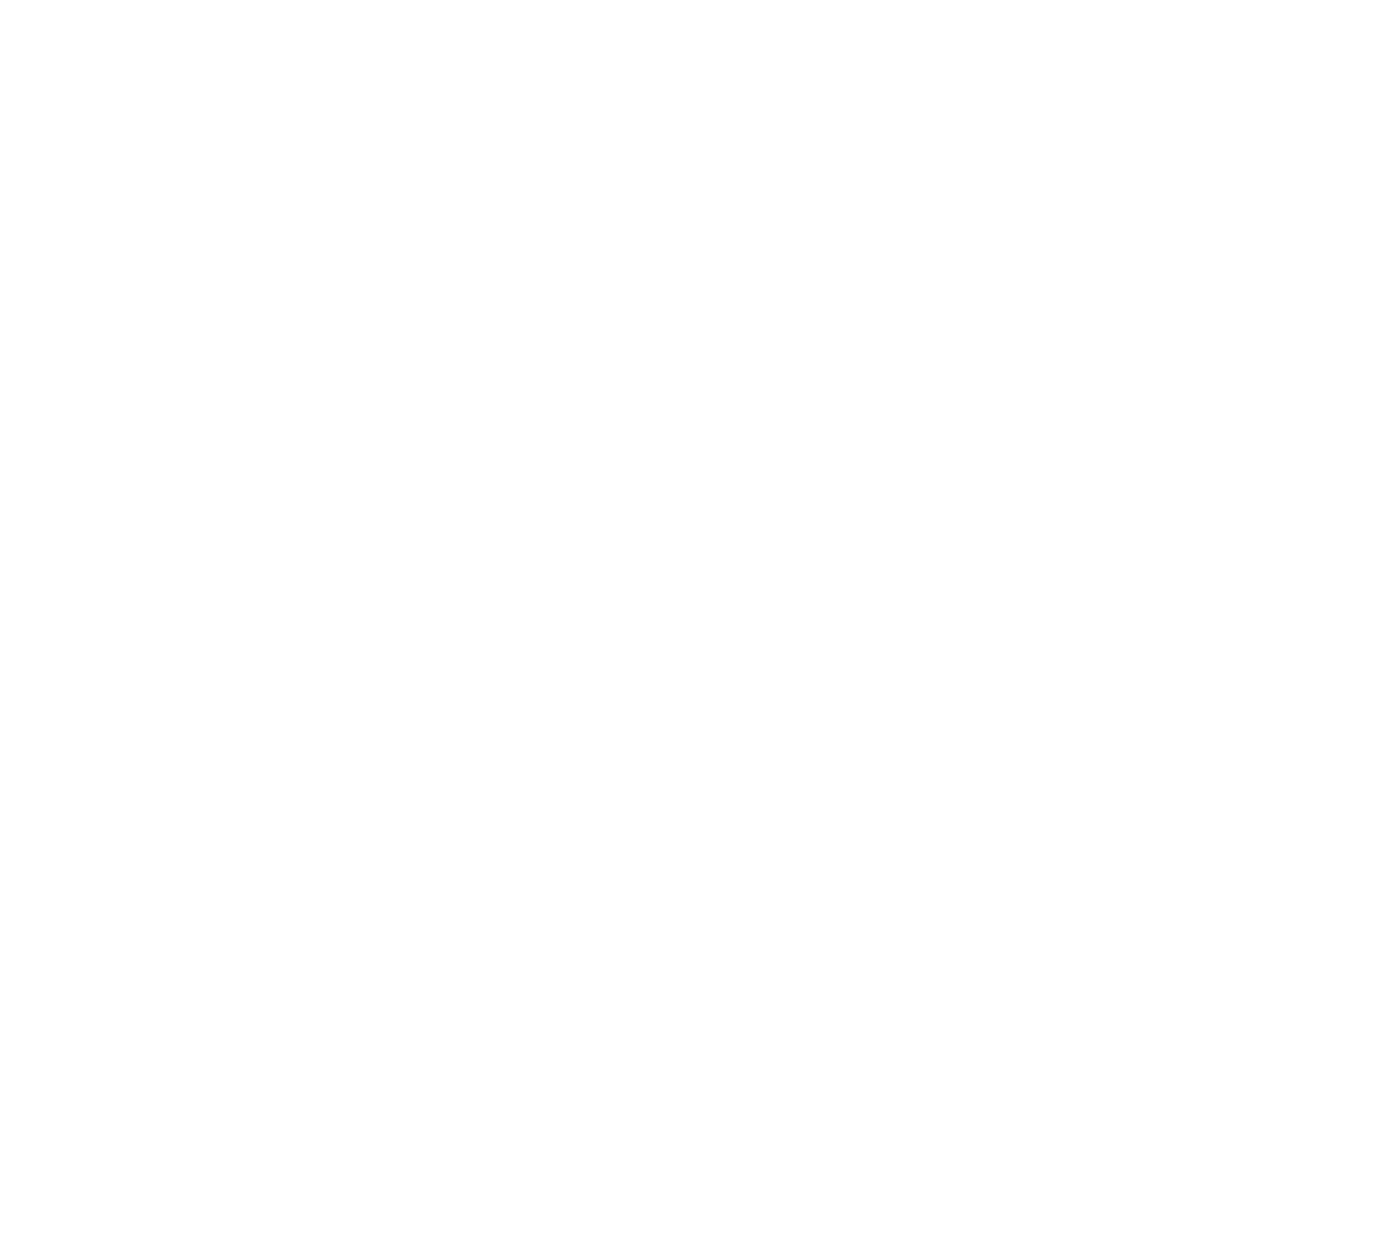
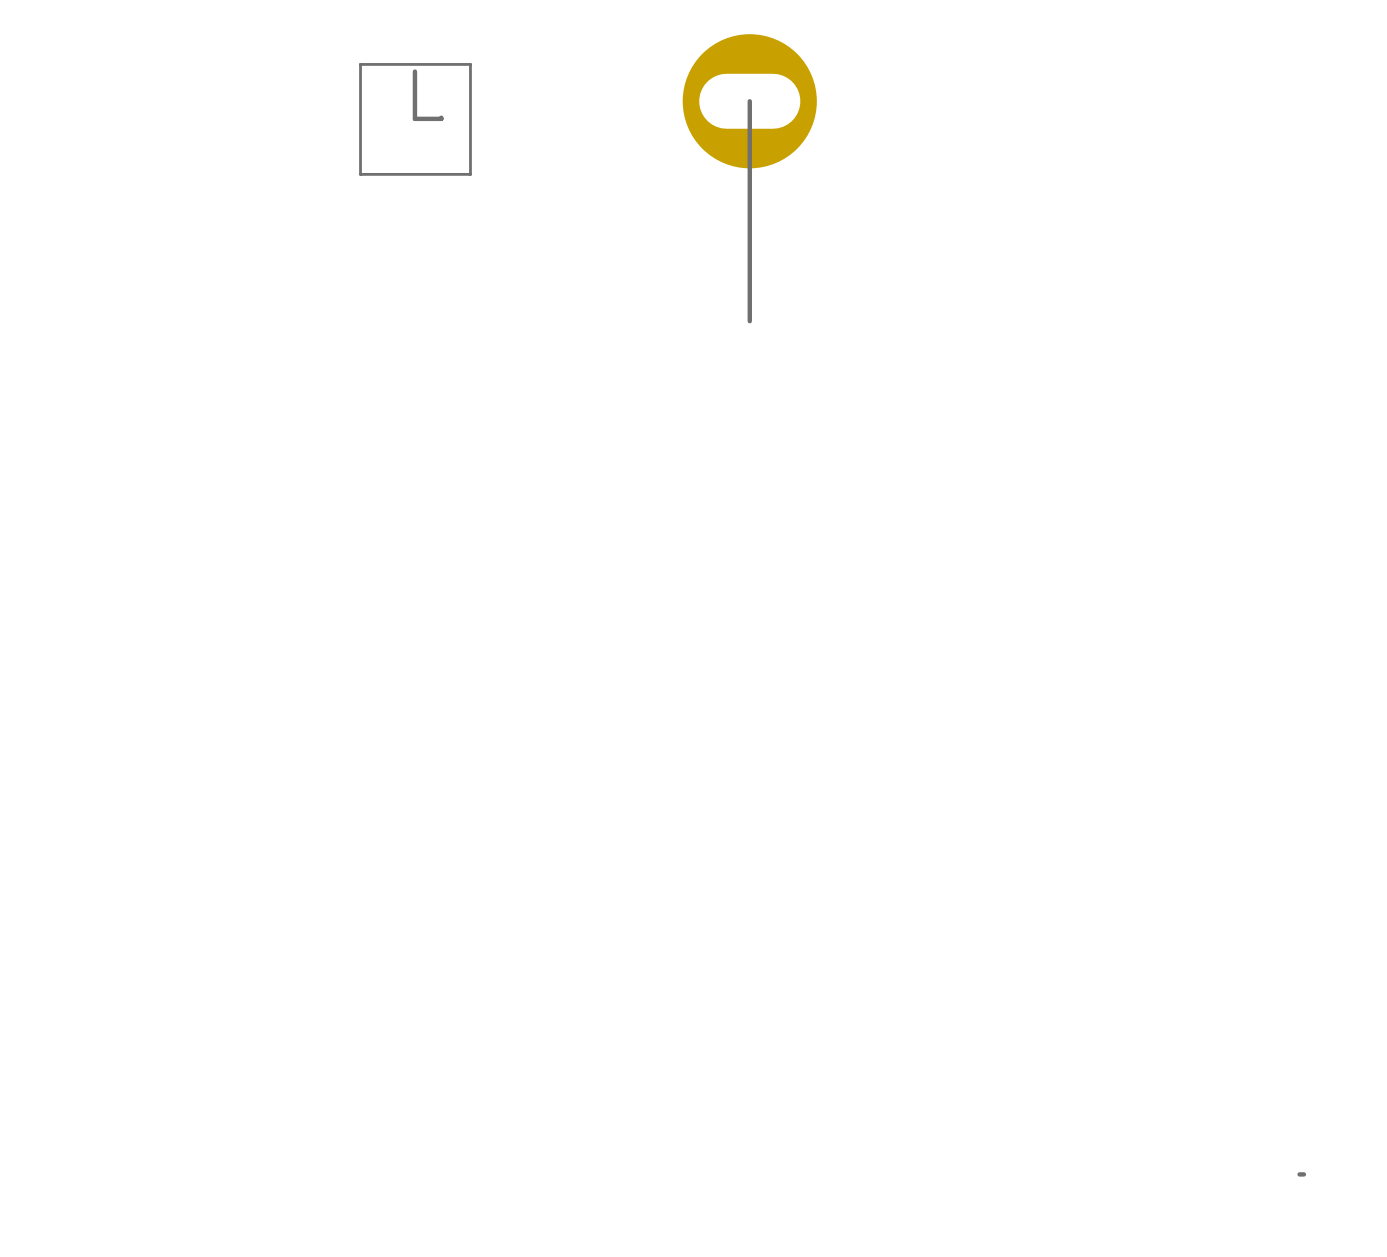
line: none -> (414, 71) (414, 118) (441, 117)
line: none -> (749, 101) (749, 321)
part: none -> (749, 101)
part: none -> (415, 119)
line: none -> (1299, 1174) (1303, 1174)

